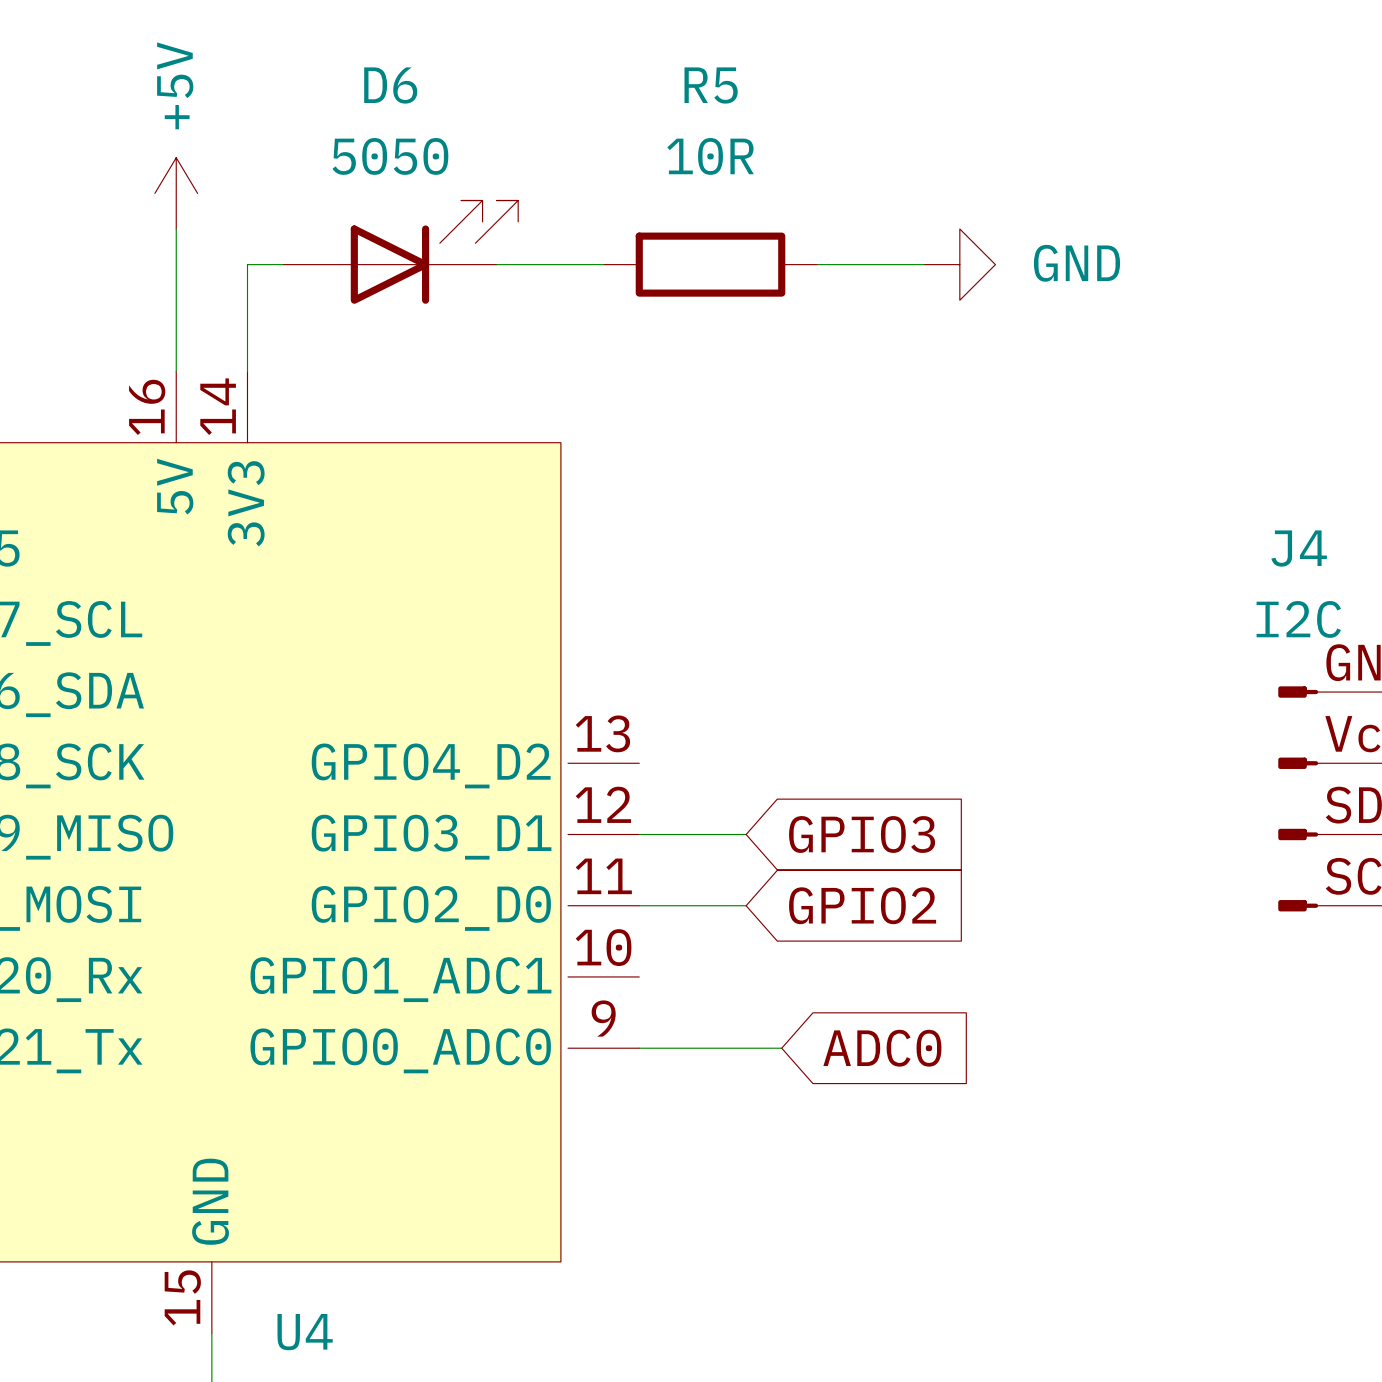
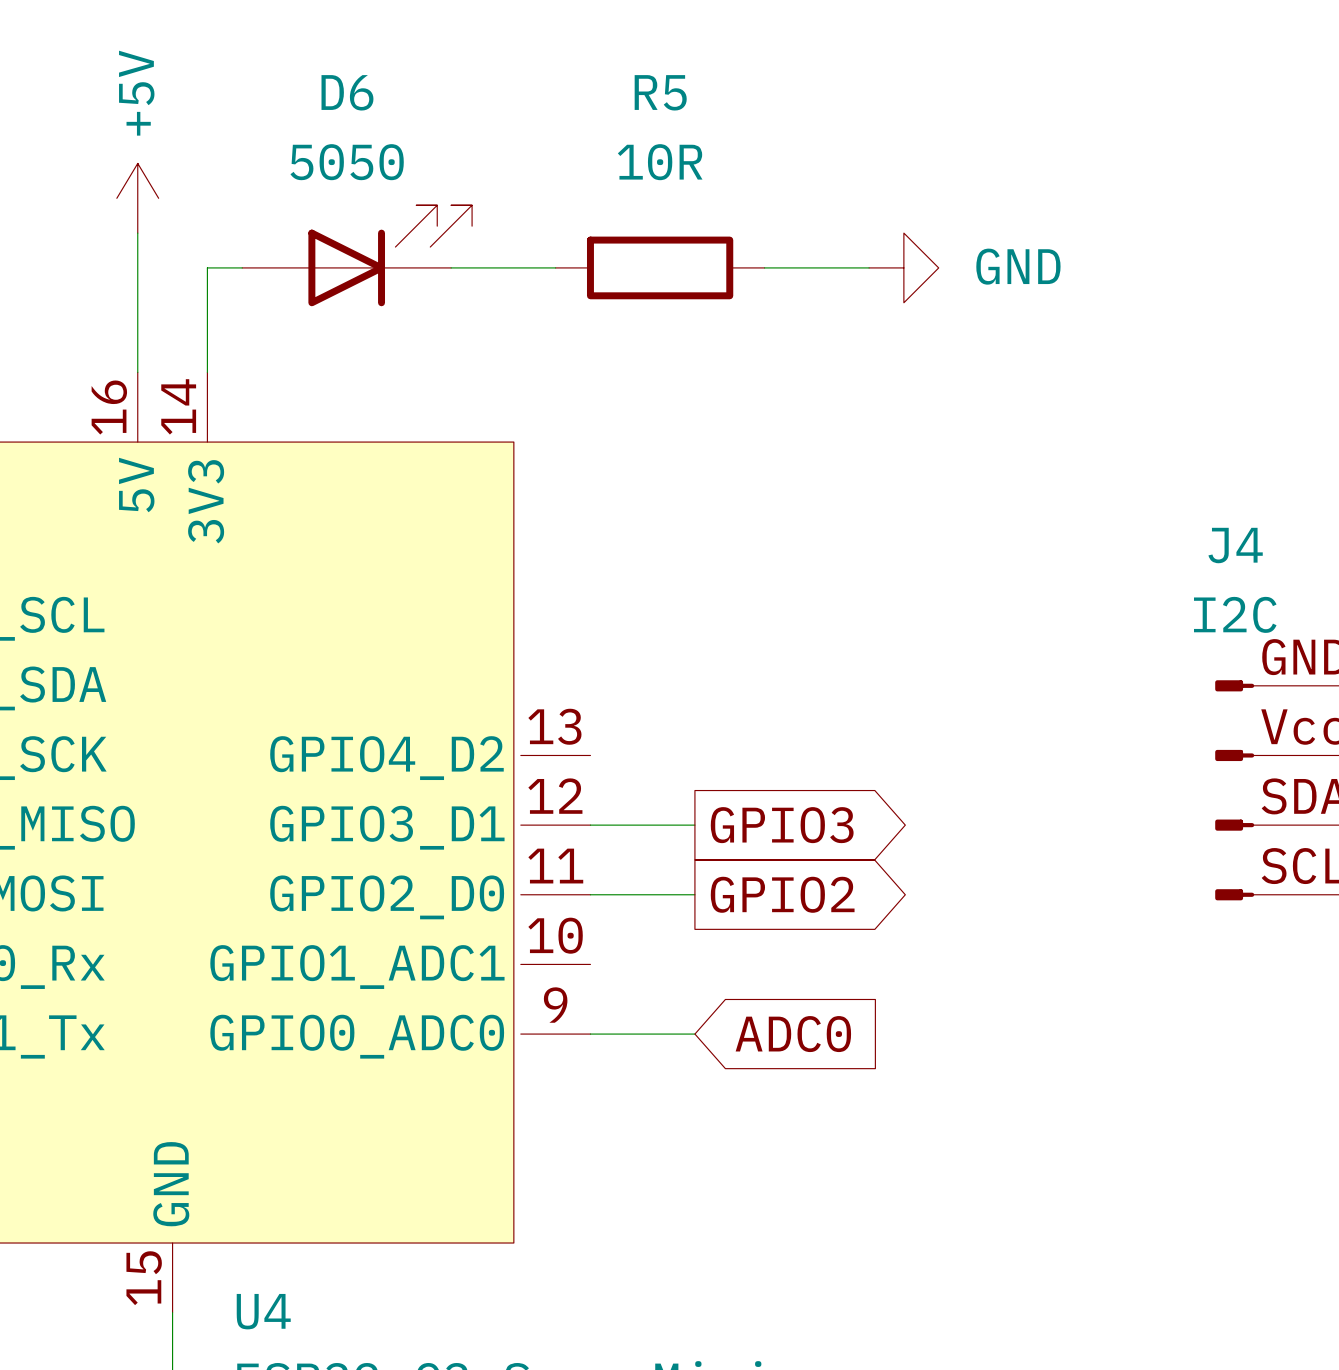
global label shape: input (862, 834) -> output (782, 825)
global label shape: input (862, 905) -> output (782, 894)
wire: (746, 1048) (781, 1048) -> none
global label position: ADC0 (882, 1048) -> ADC0 (793, 1034)

